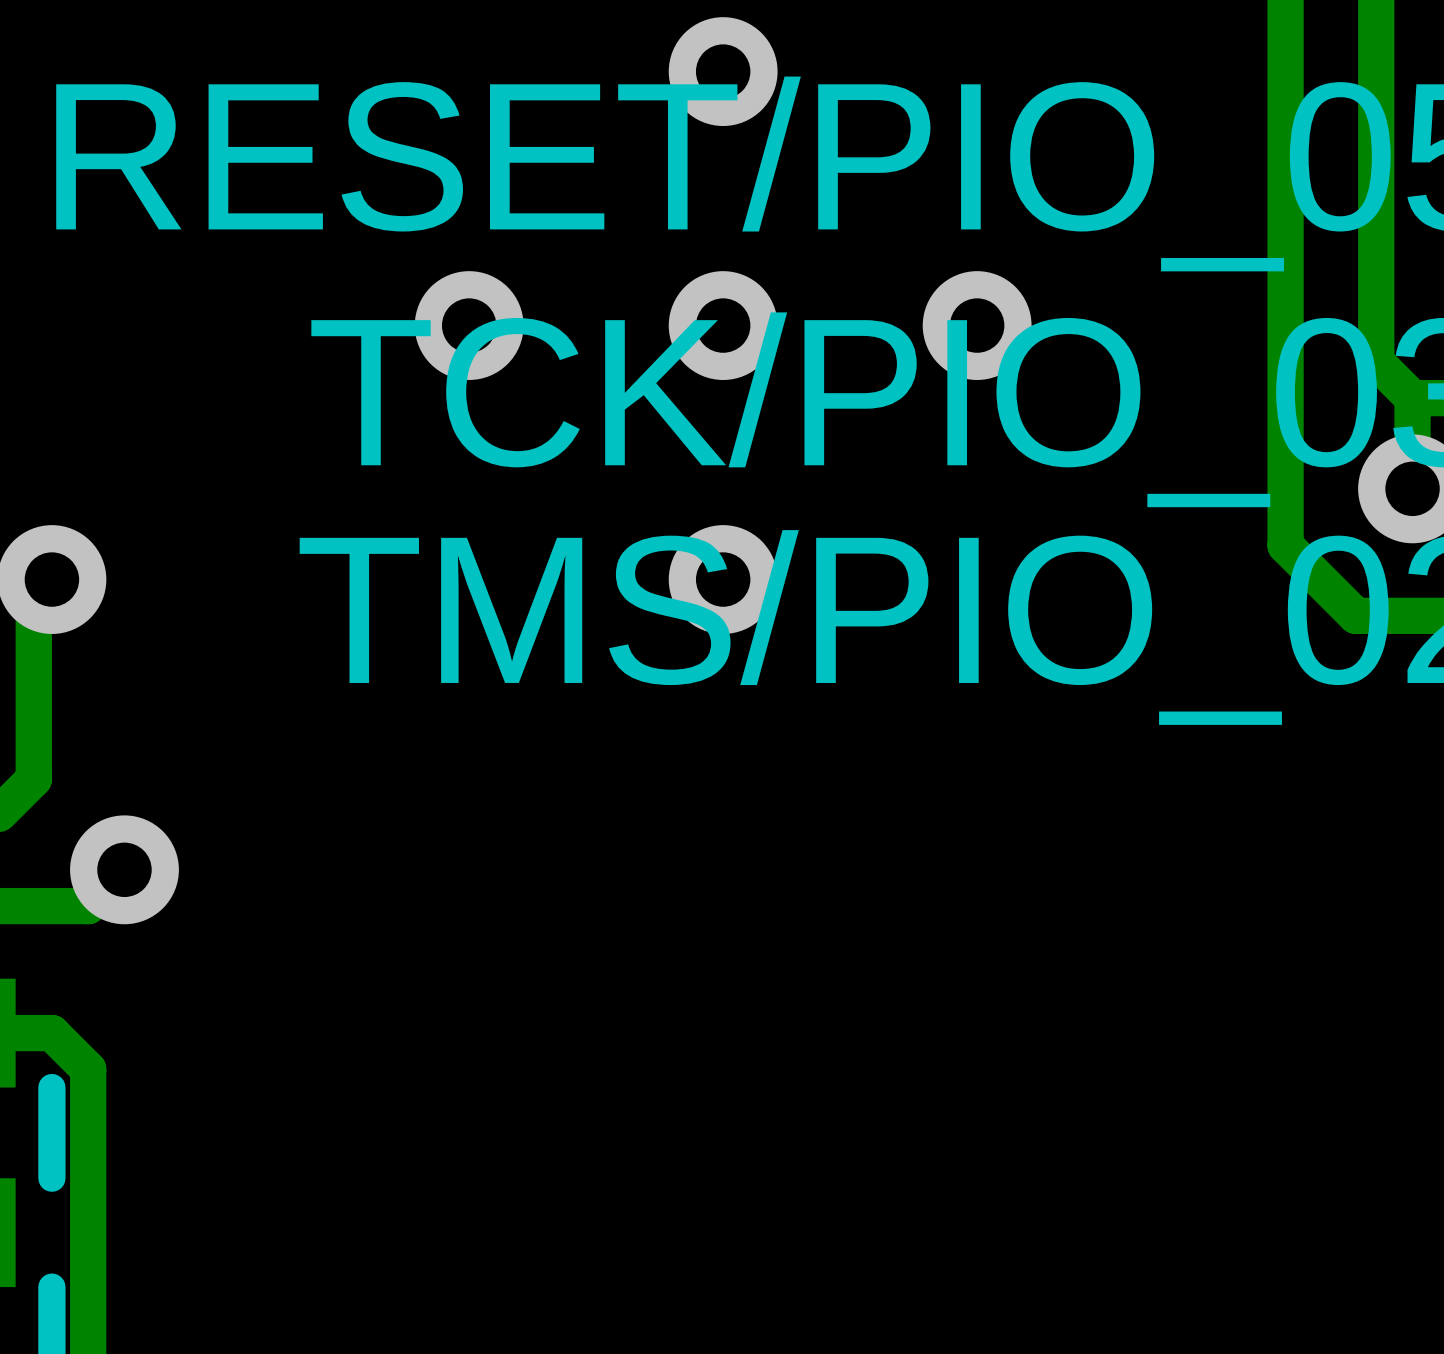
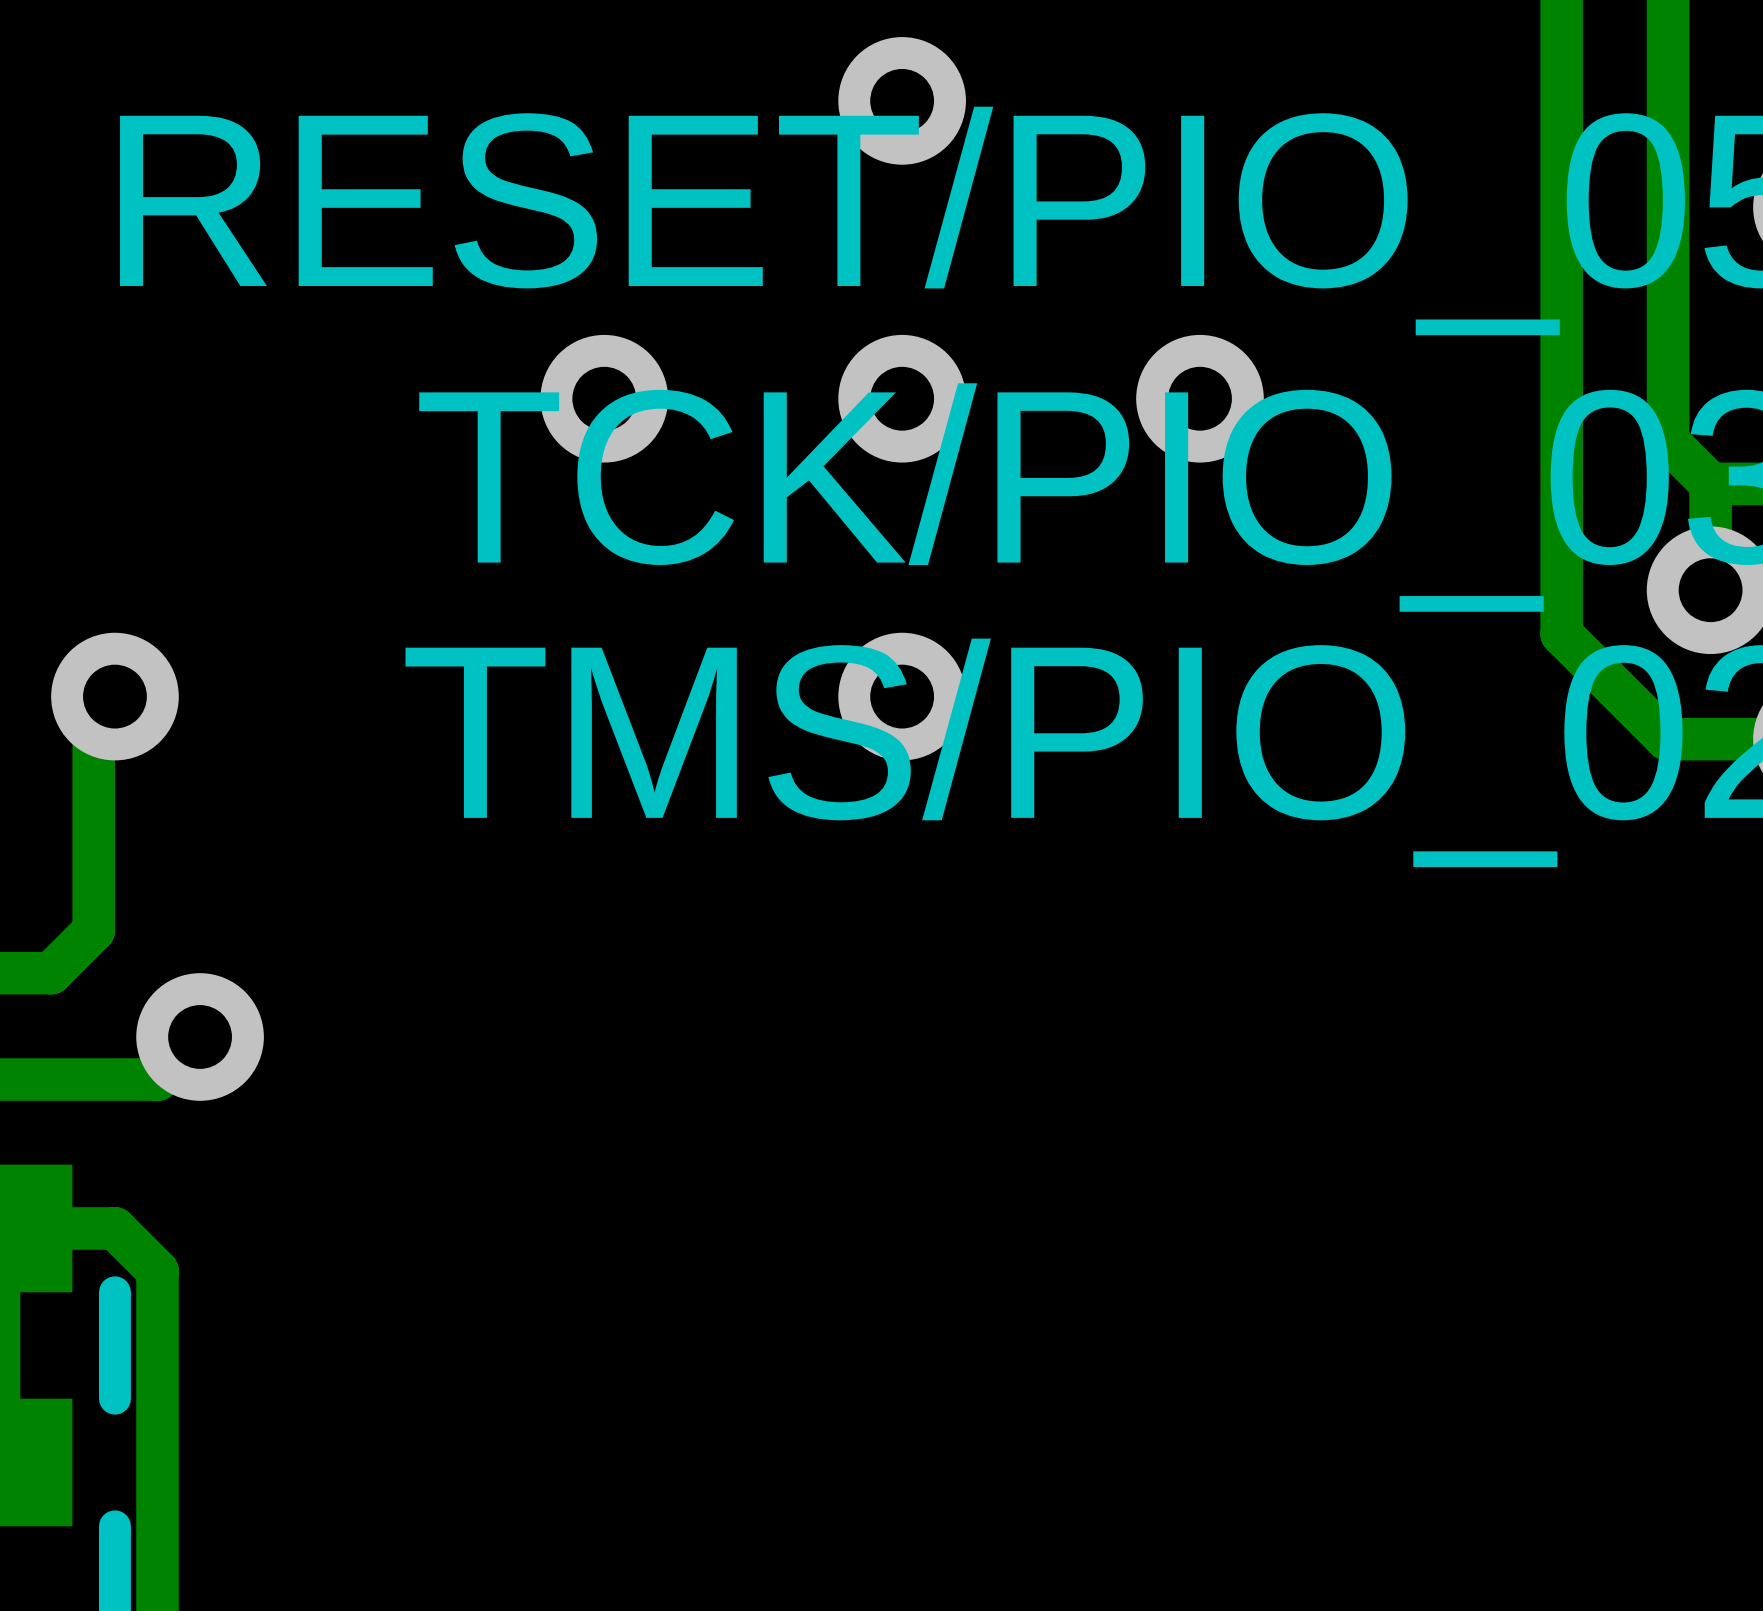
track: (1285, 526) (1285, 545) (1355, 615) (1375, 615) -> (1561, 634) (1666, 739)

